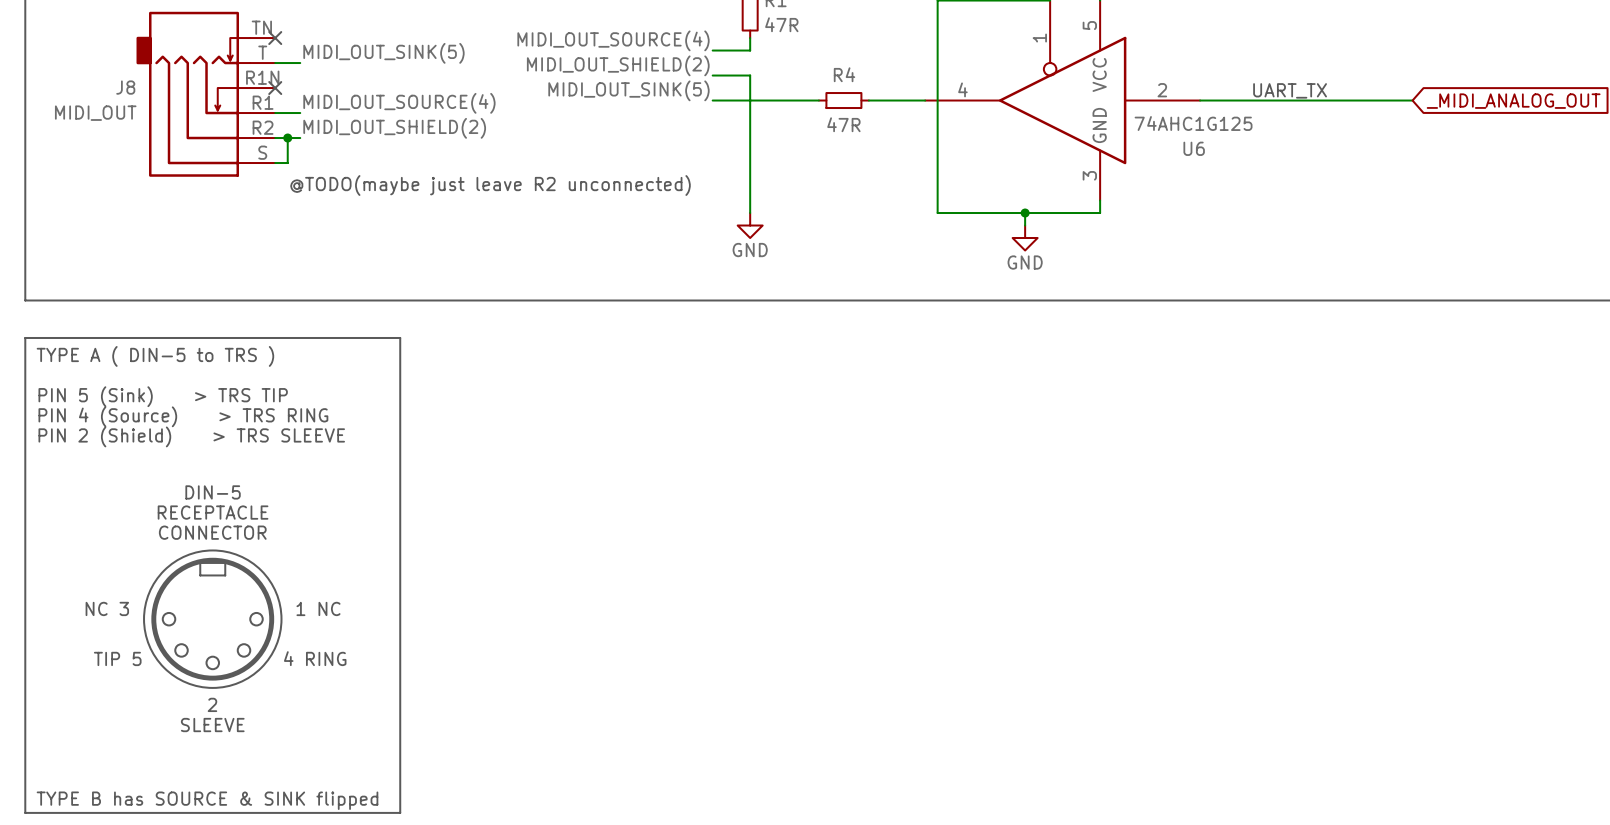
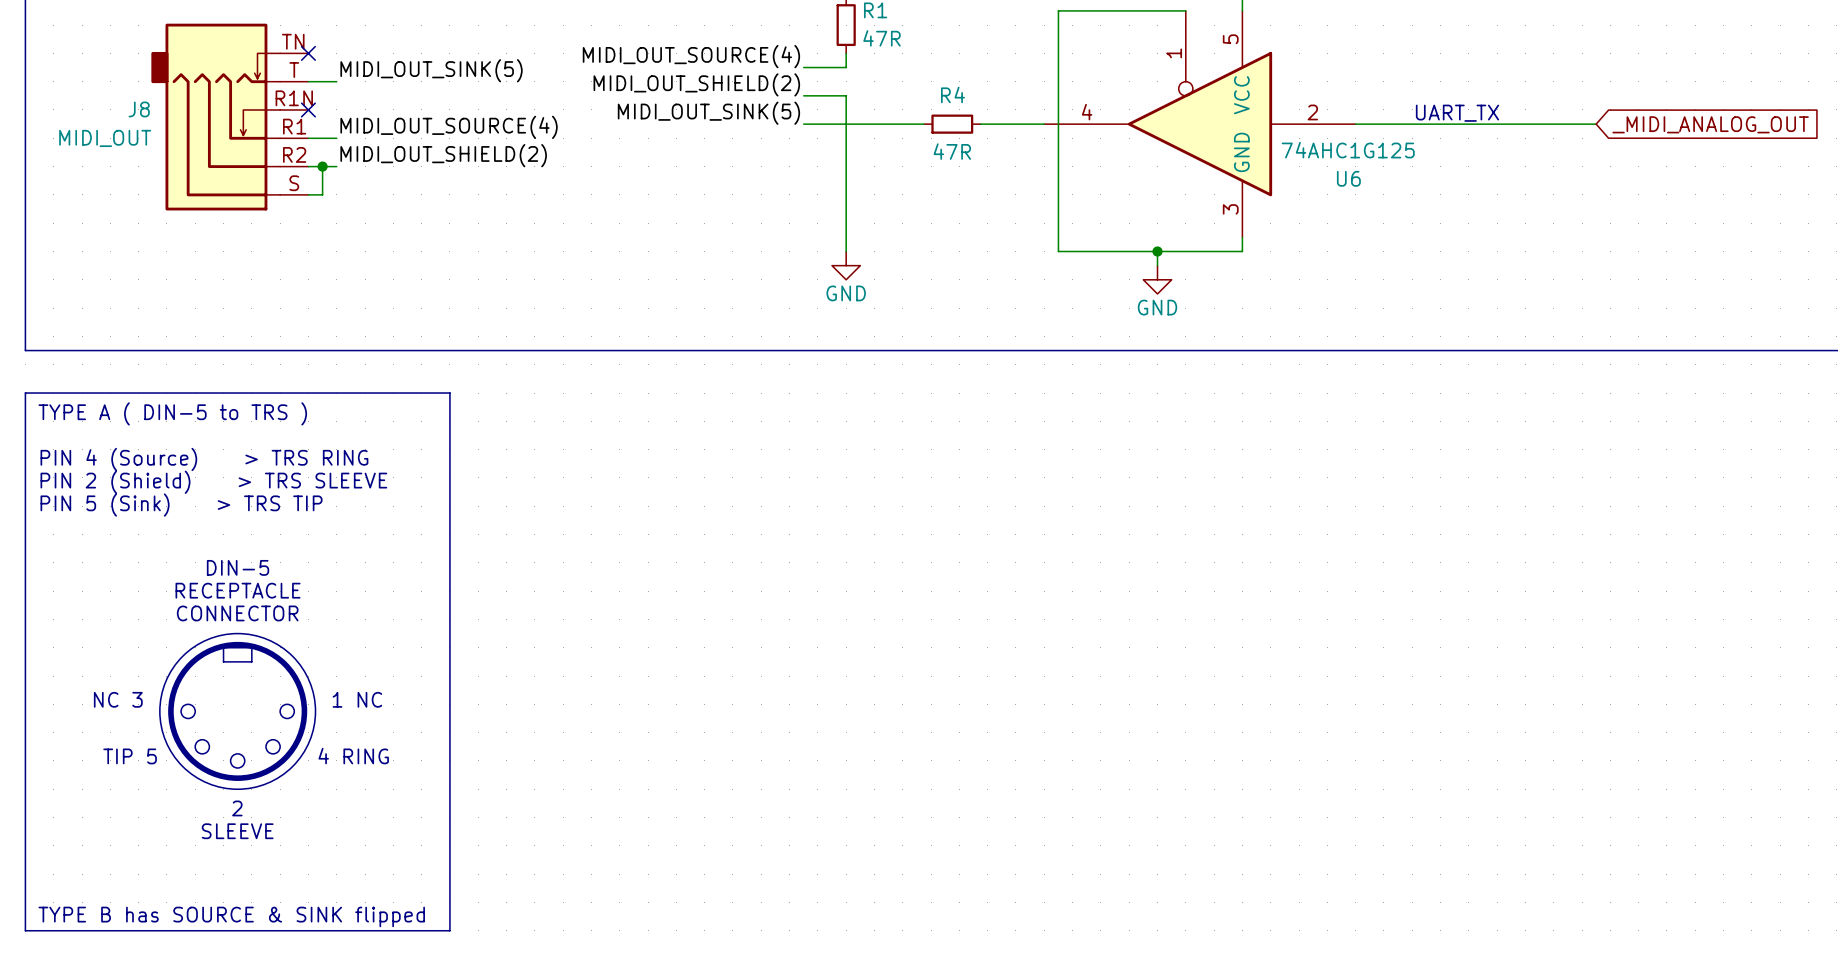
text: @TODO(maybe just leave R2 unconnected) (490, 185) -> none
text: PIN 5 (Sink) > TRS TIP (163, 396) -> PIN 4 (Source) > TRS RING (204, 459)
text: PIN 4 (Source) > TRS RING (183, 416) -> PIN 2 (Shield) > TRS SLEEVE (213, 482)
text: PIN 2 (Shield) > TRS SLEEVE (191, 436) -> PIN 5 (Sink) > TRS TIP (181, 505)

